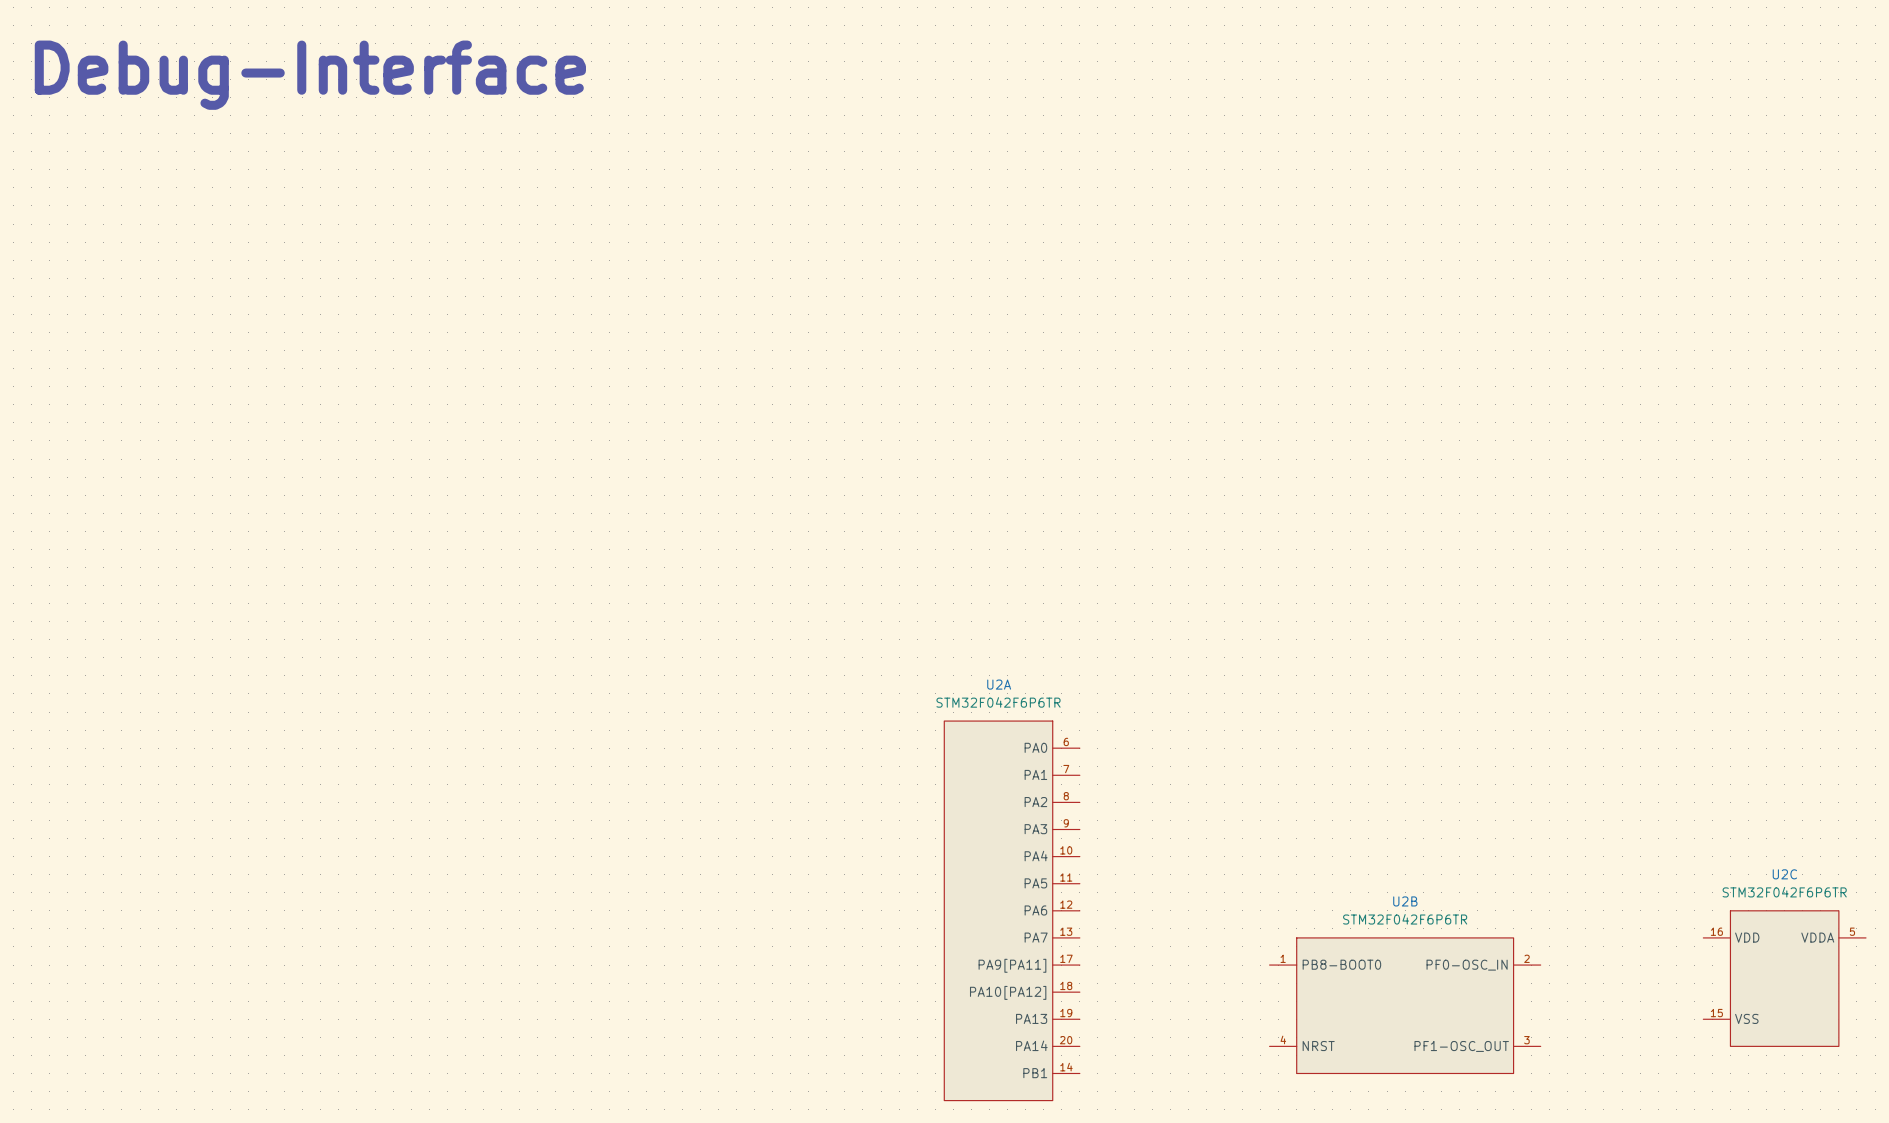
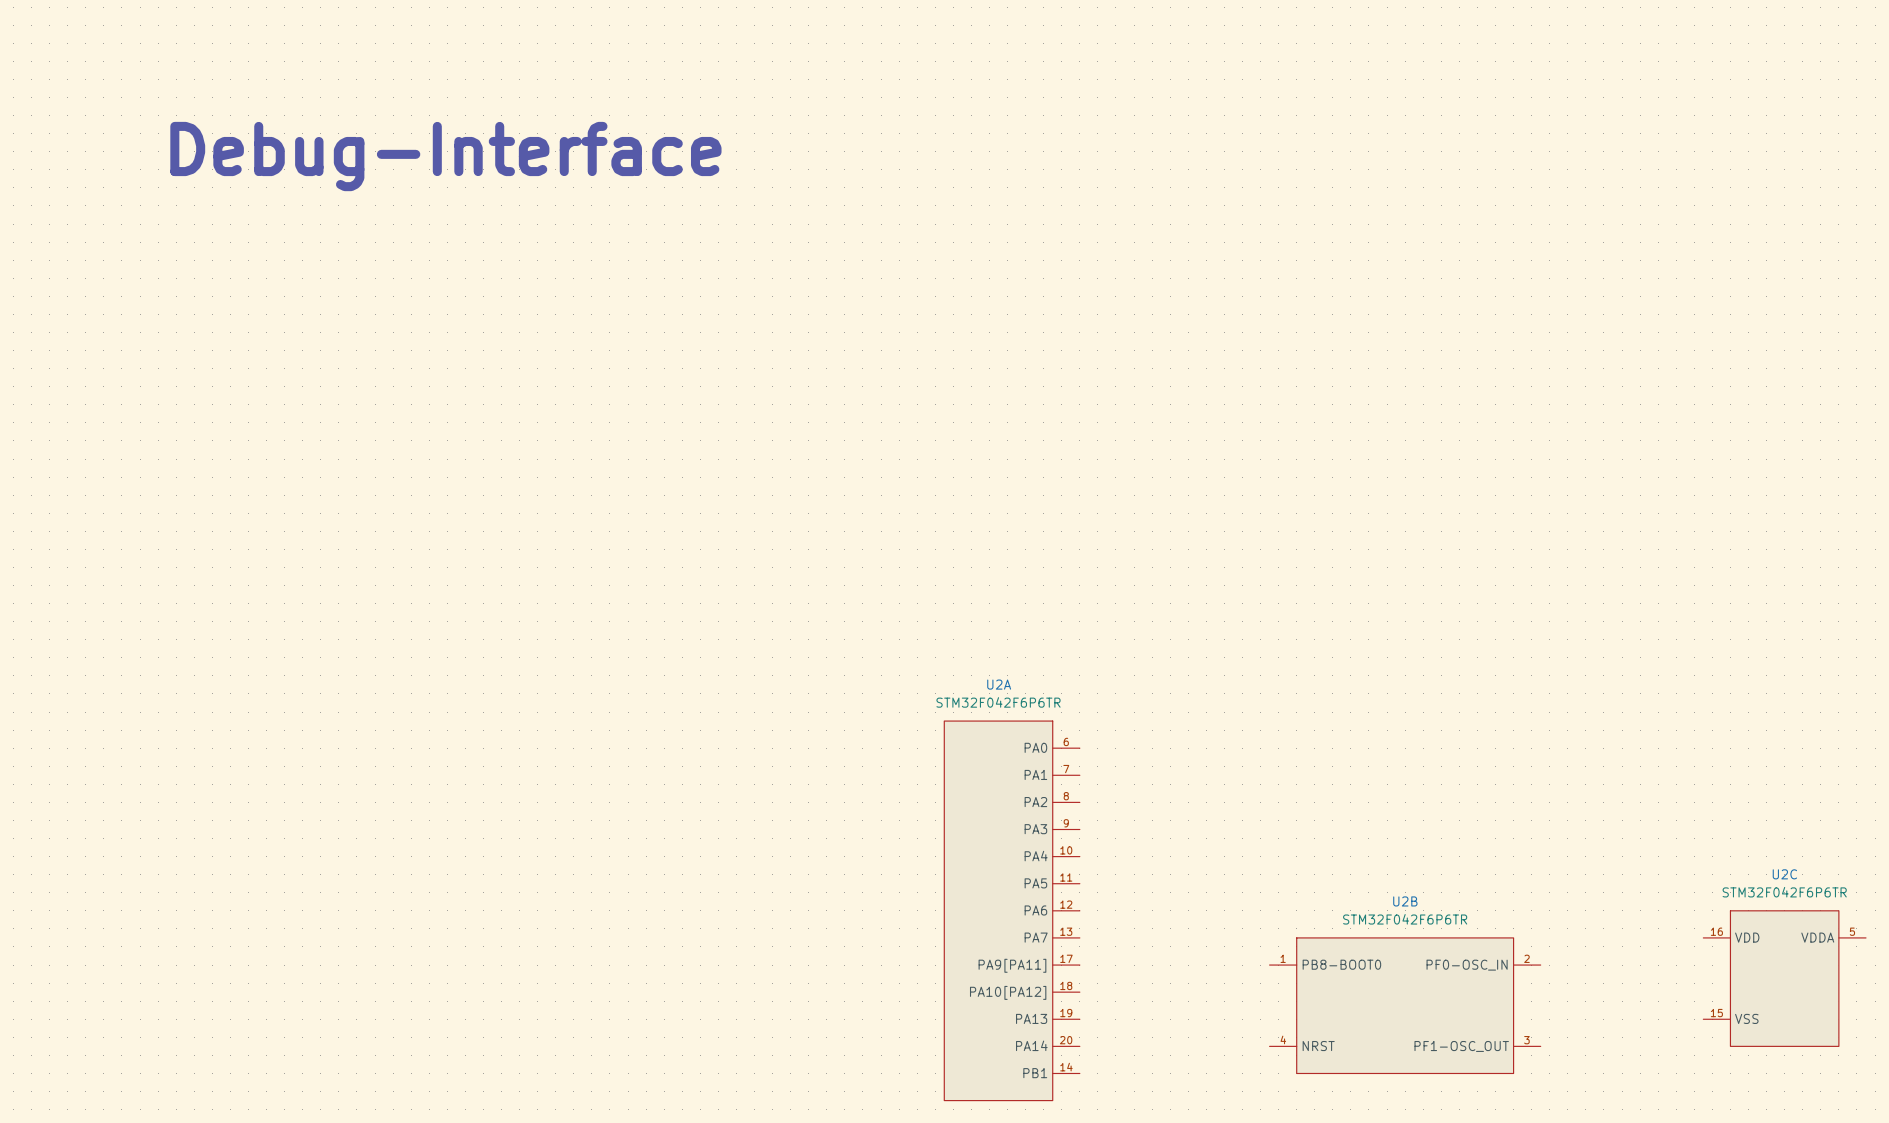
text position: Debug-Interface (310, 75) -> Debug-Interface (445, 156)

